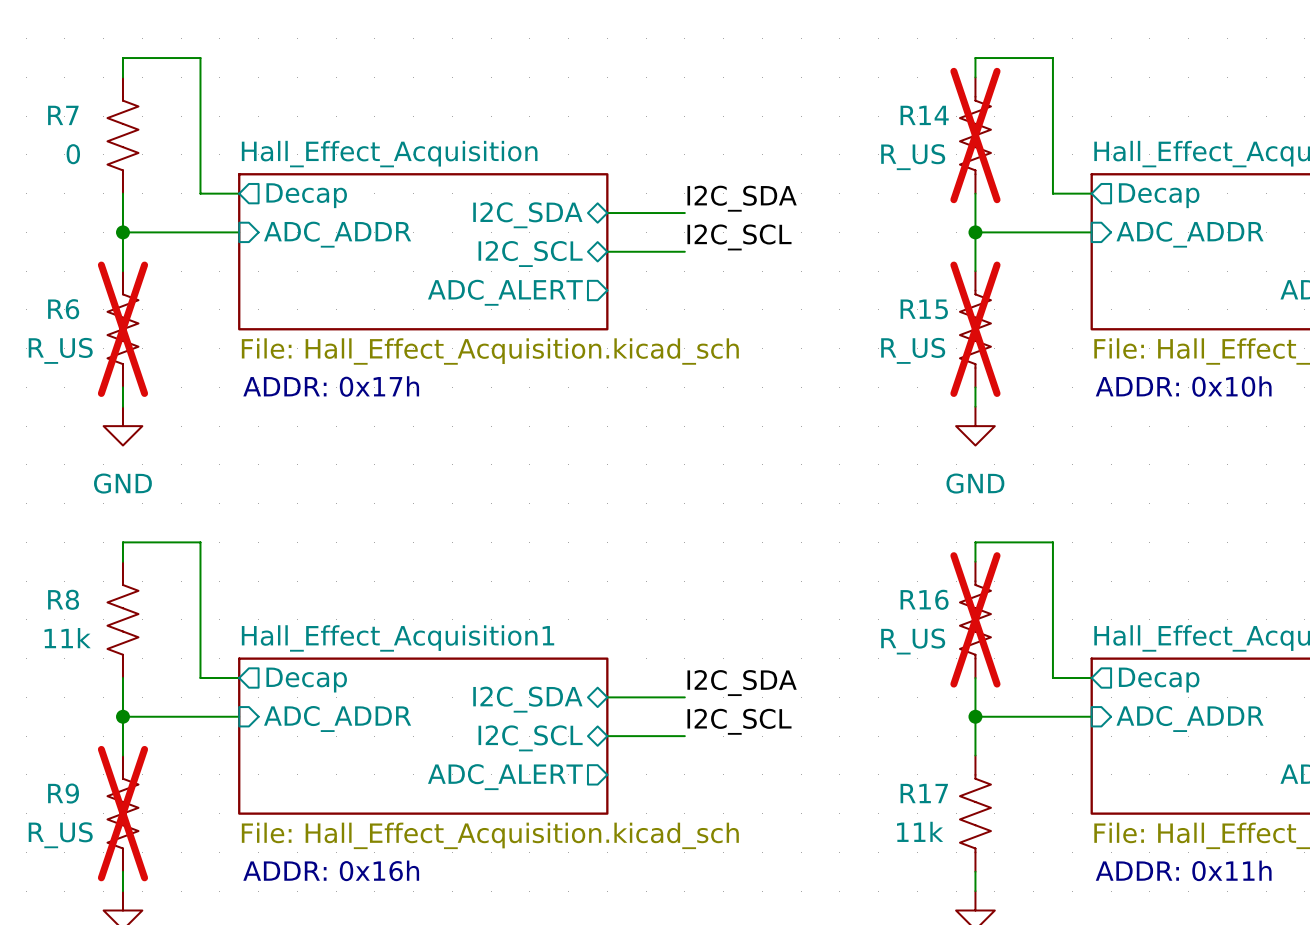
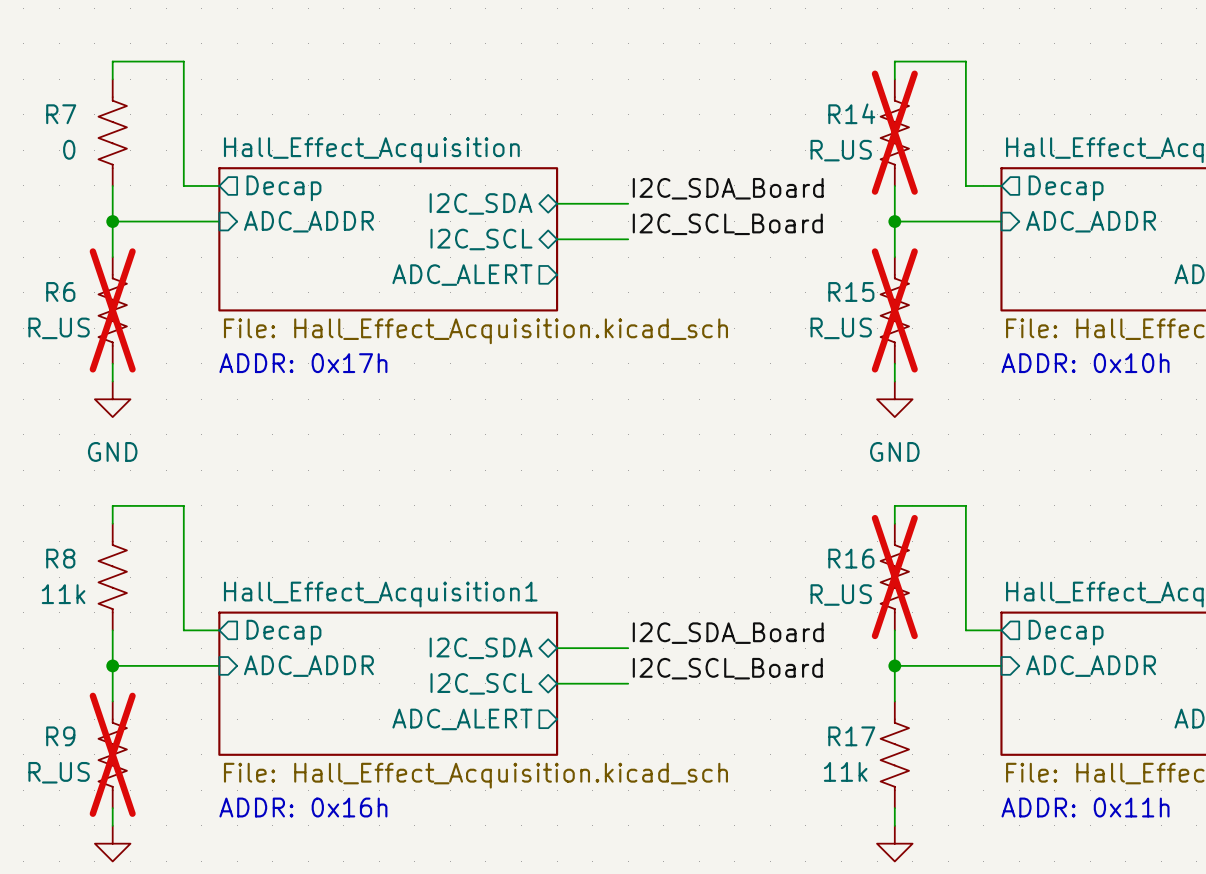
label: I2C_SDA (742, 198) -> I2C_SDA_Board (728, 188)
label: I2C_SCL (739, 237) -> I2C_SCL_Board (727, 224)
label: I2C_SDA (742, 683) -> I2C_SDA_Board (728, 633)
label: I2C_SCL (739, 721) -> I2C_SCL_Board (727, 668)

